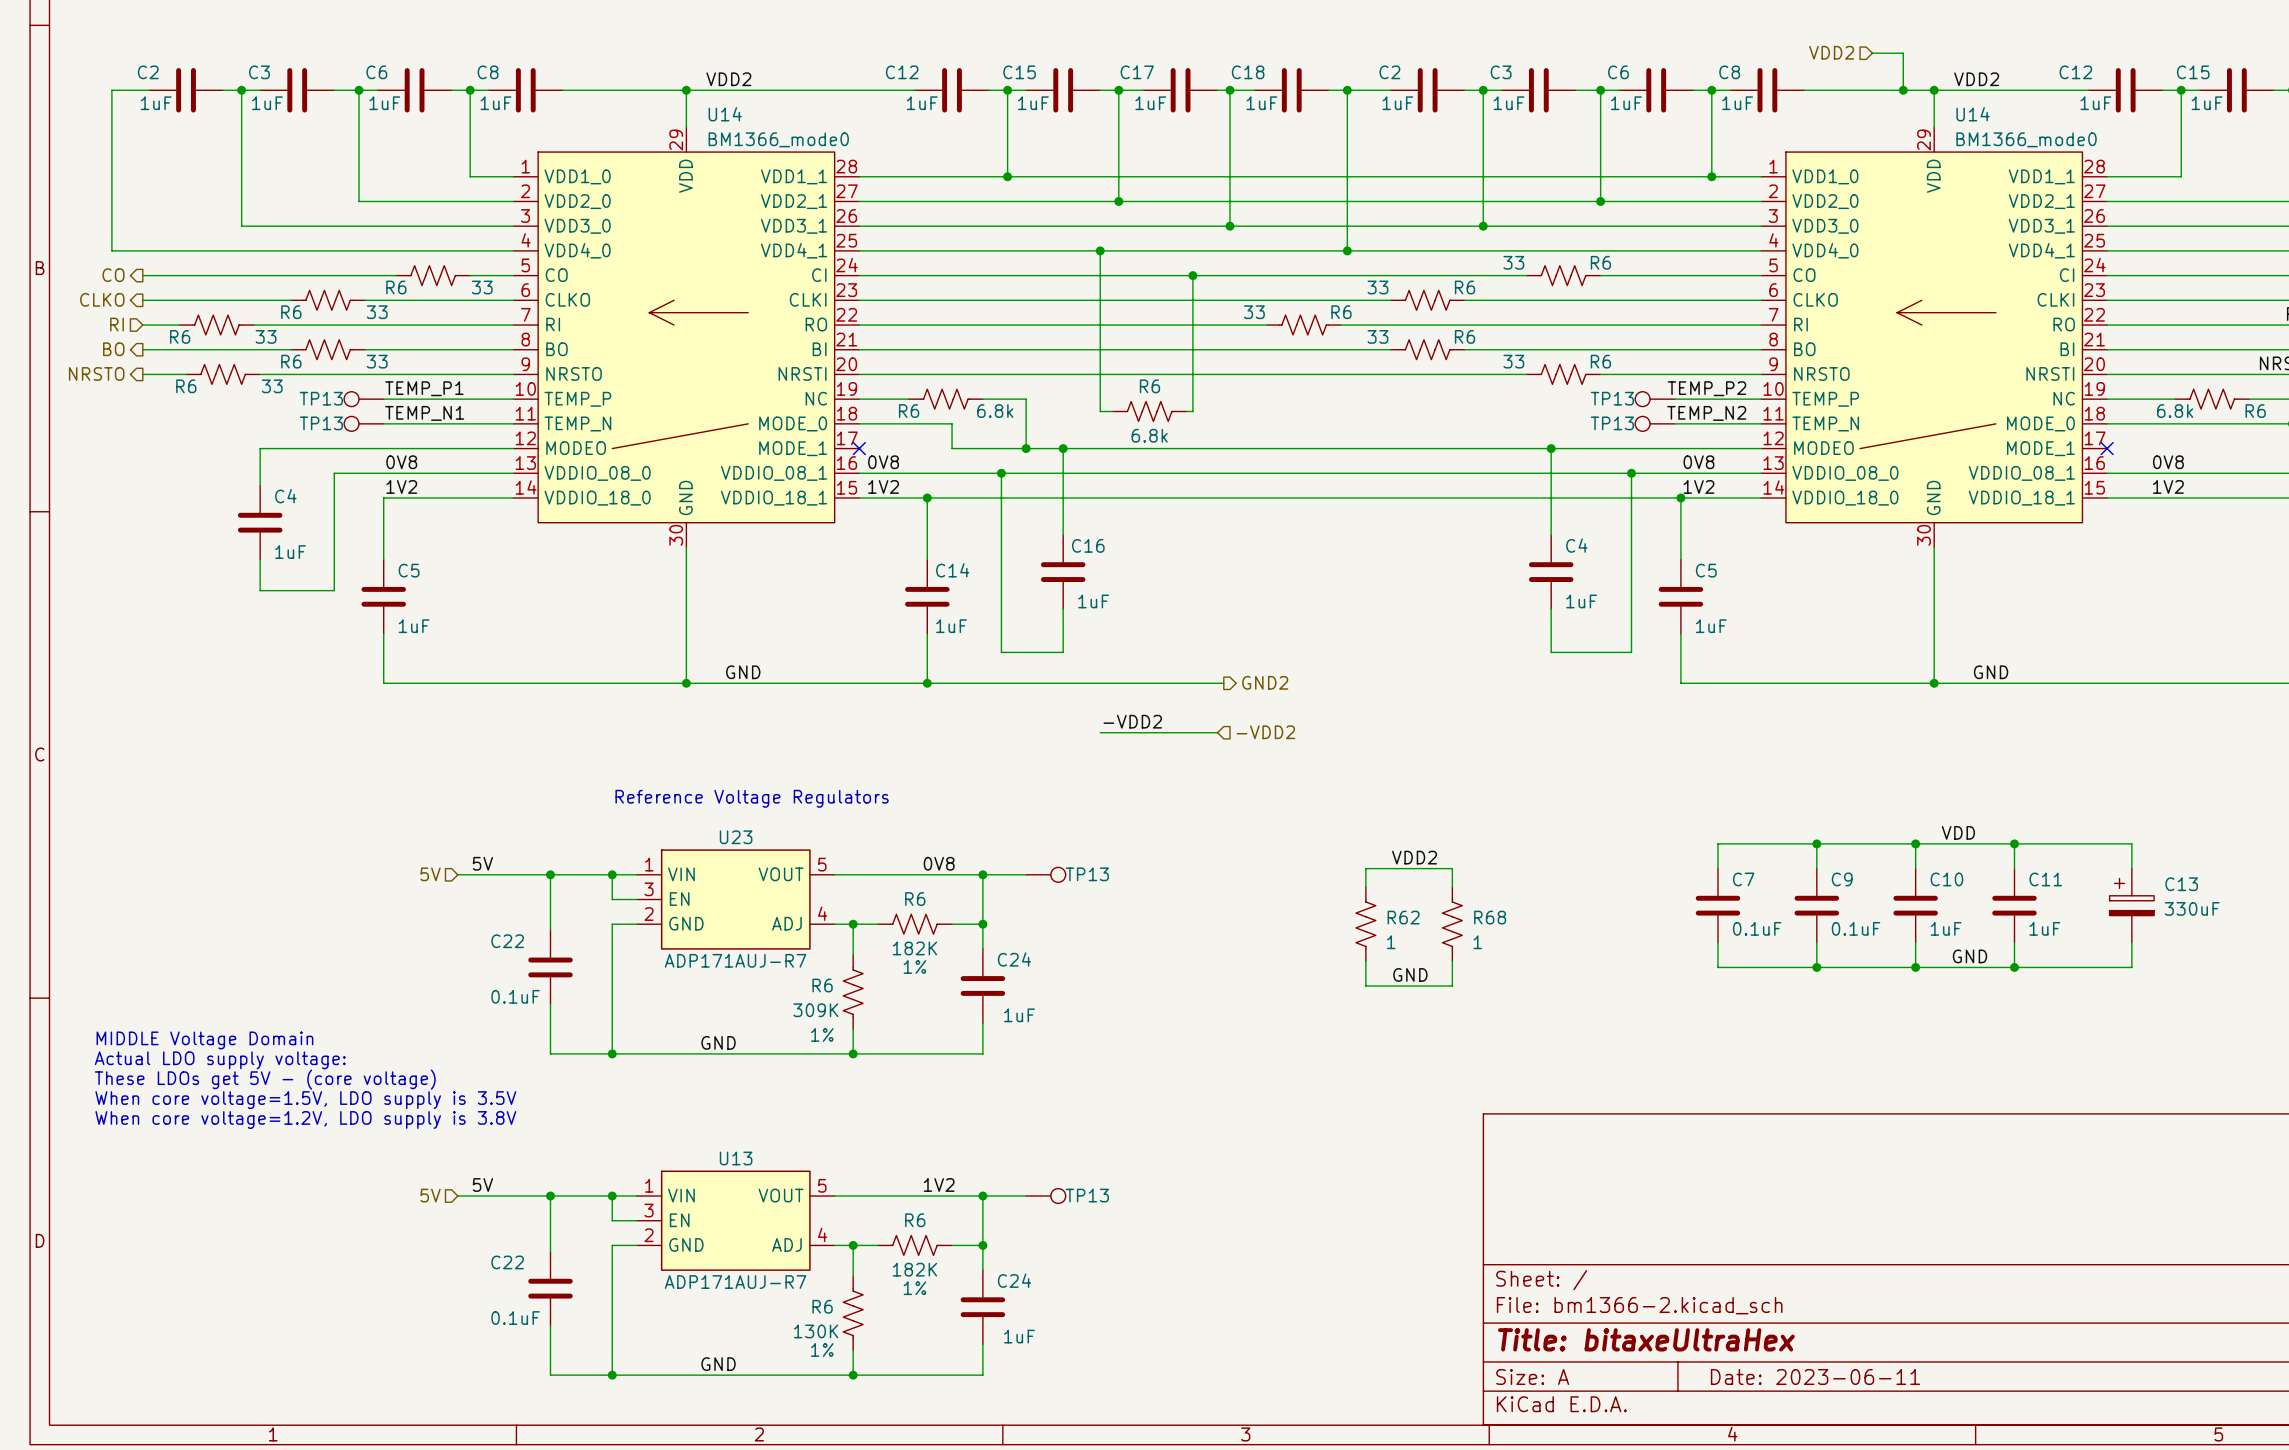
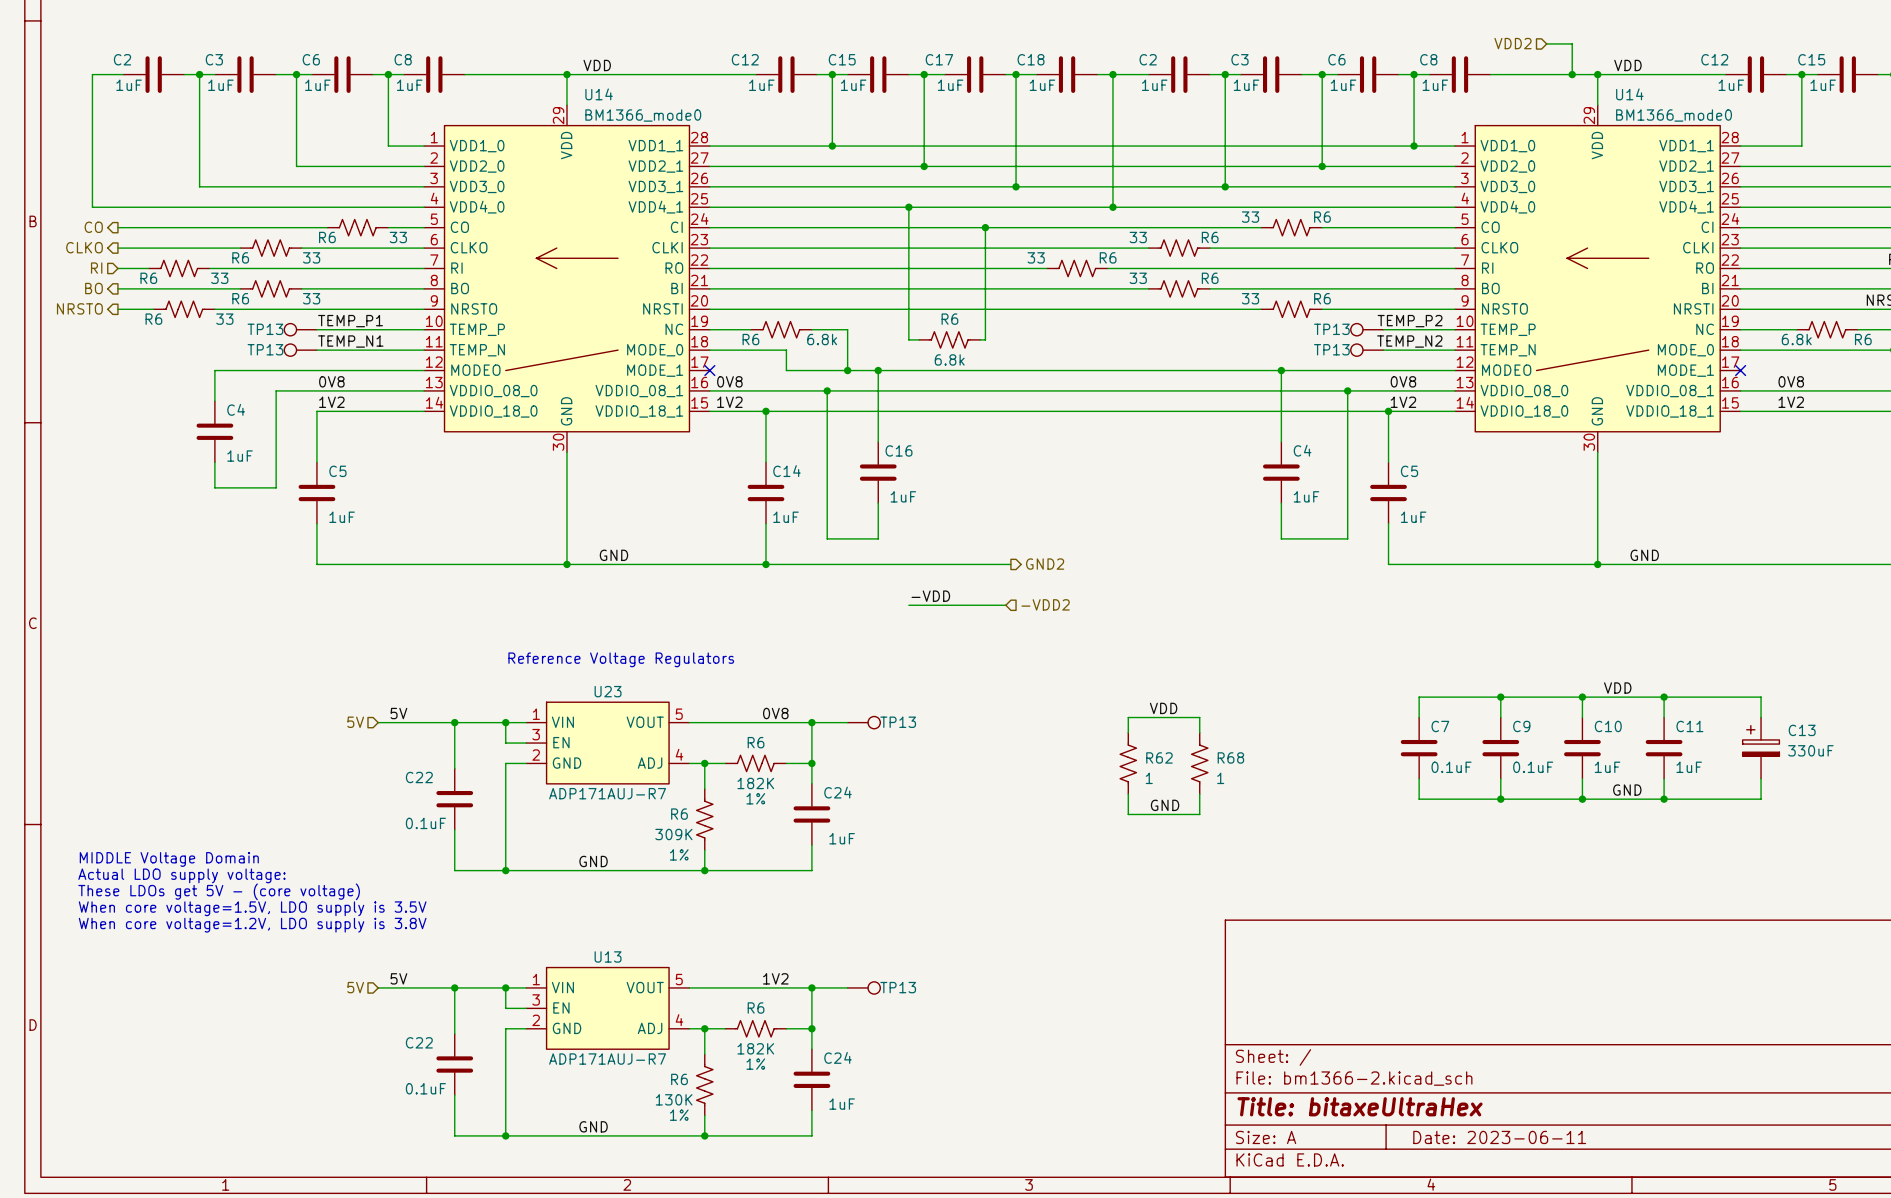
label: VDD2 (728, 79) -> VDD (597, 65)
label: VDD2 (1976, 79) -> VDD (1627, 65)
label: -VDD2 (1132, 721) -> -VDD (930, 596)
label: VDD2 (1414, 857) -> VDD (1163, 708)

